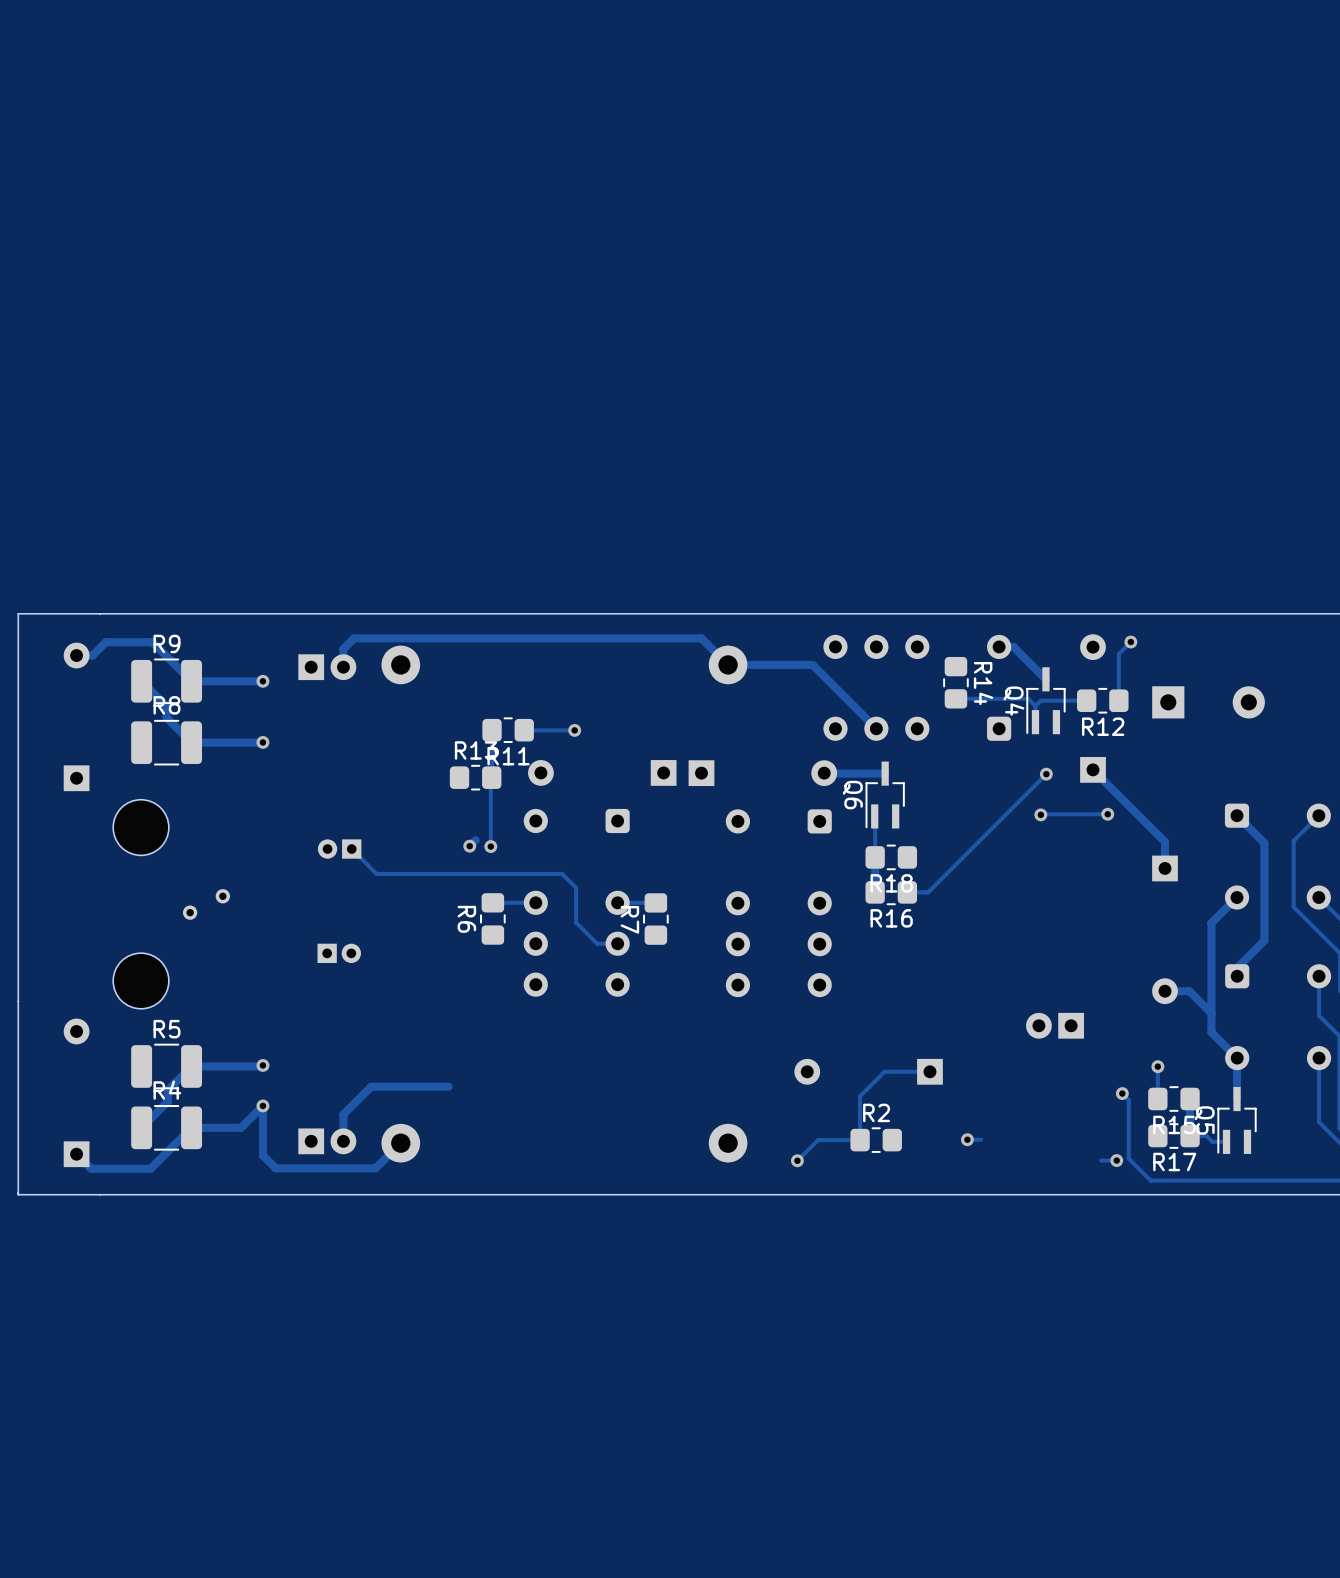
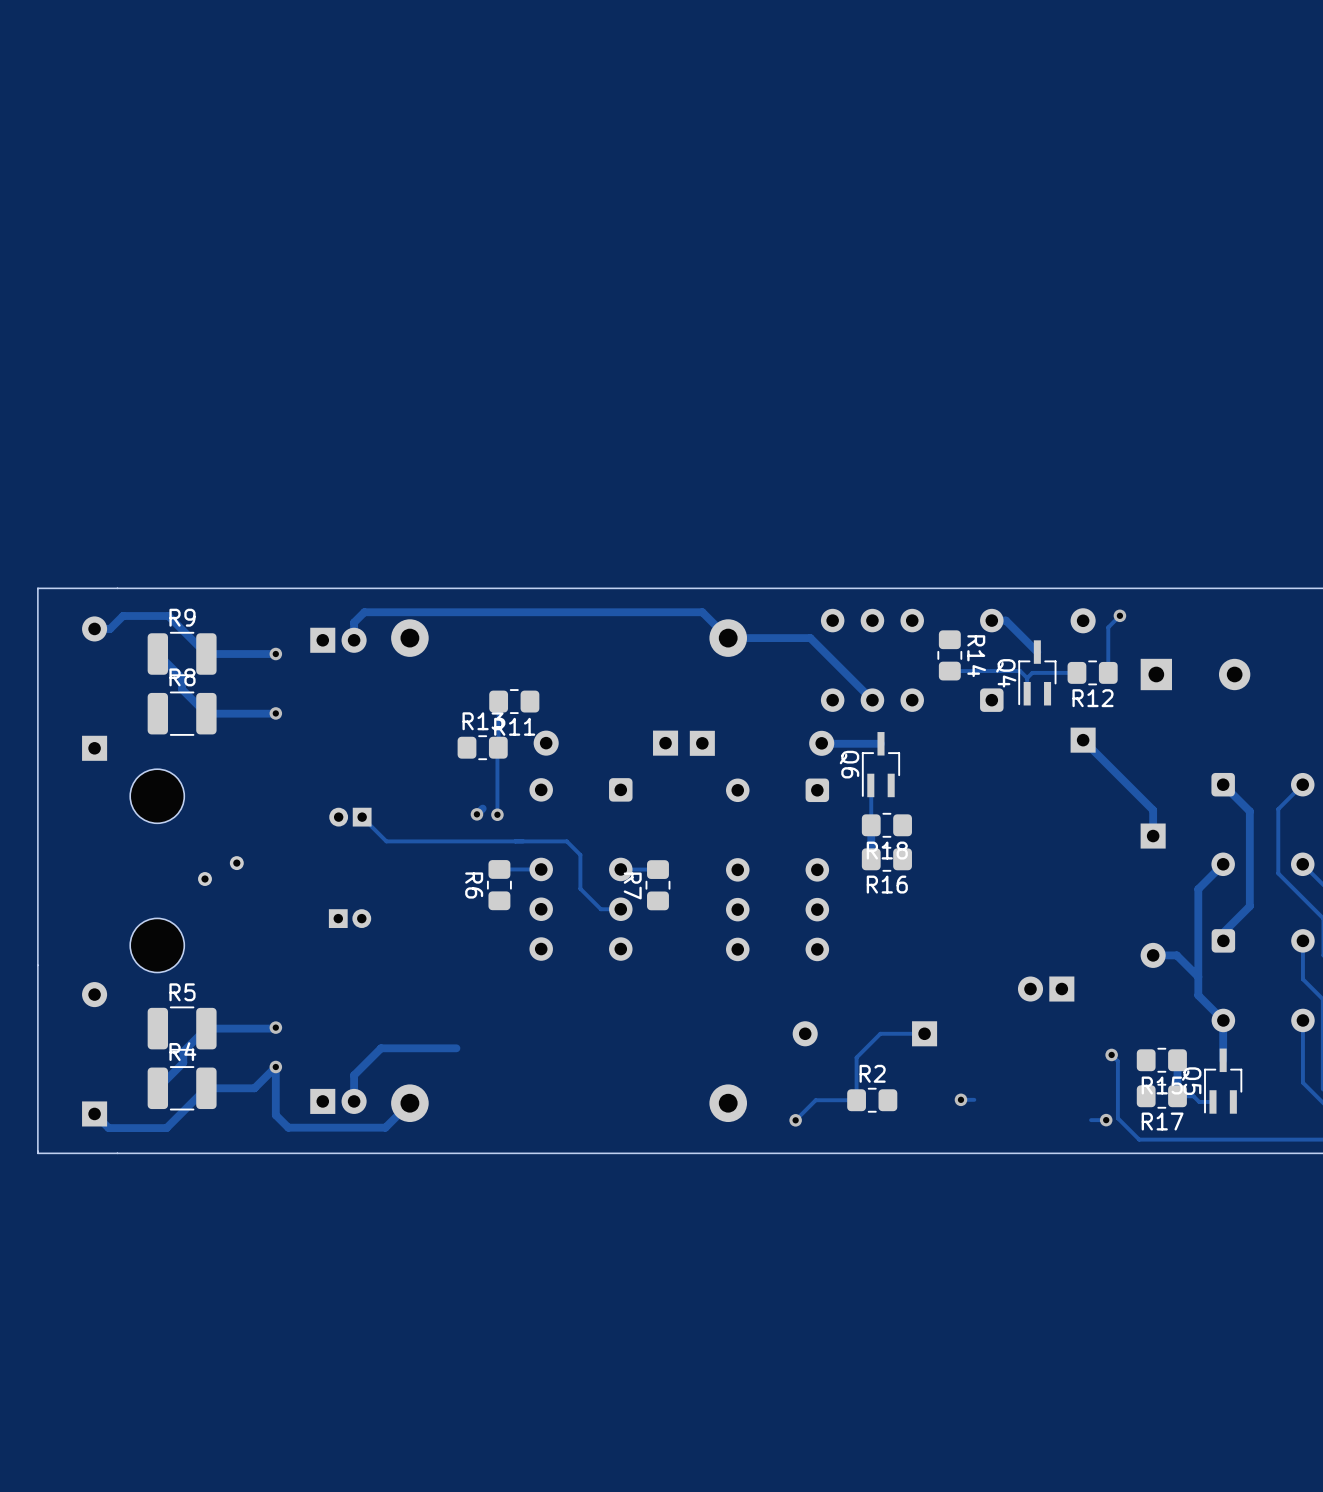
track: (574, 730) (524, 730) -> none
via: (574, 730) -> none
track: (1046, 774) (928, 892) (907, 892) -> none
via: (1046, 774) -> none
via: (1040, 814) -> none
track: (1107, 814) (1040, 814) -> none
via: (1107, 814) -> none
track: (1157, 1066) (1157, 1098) -> none
via: (1157, 1066) -> none

